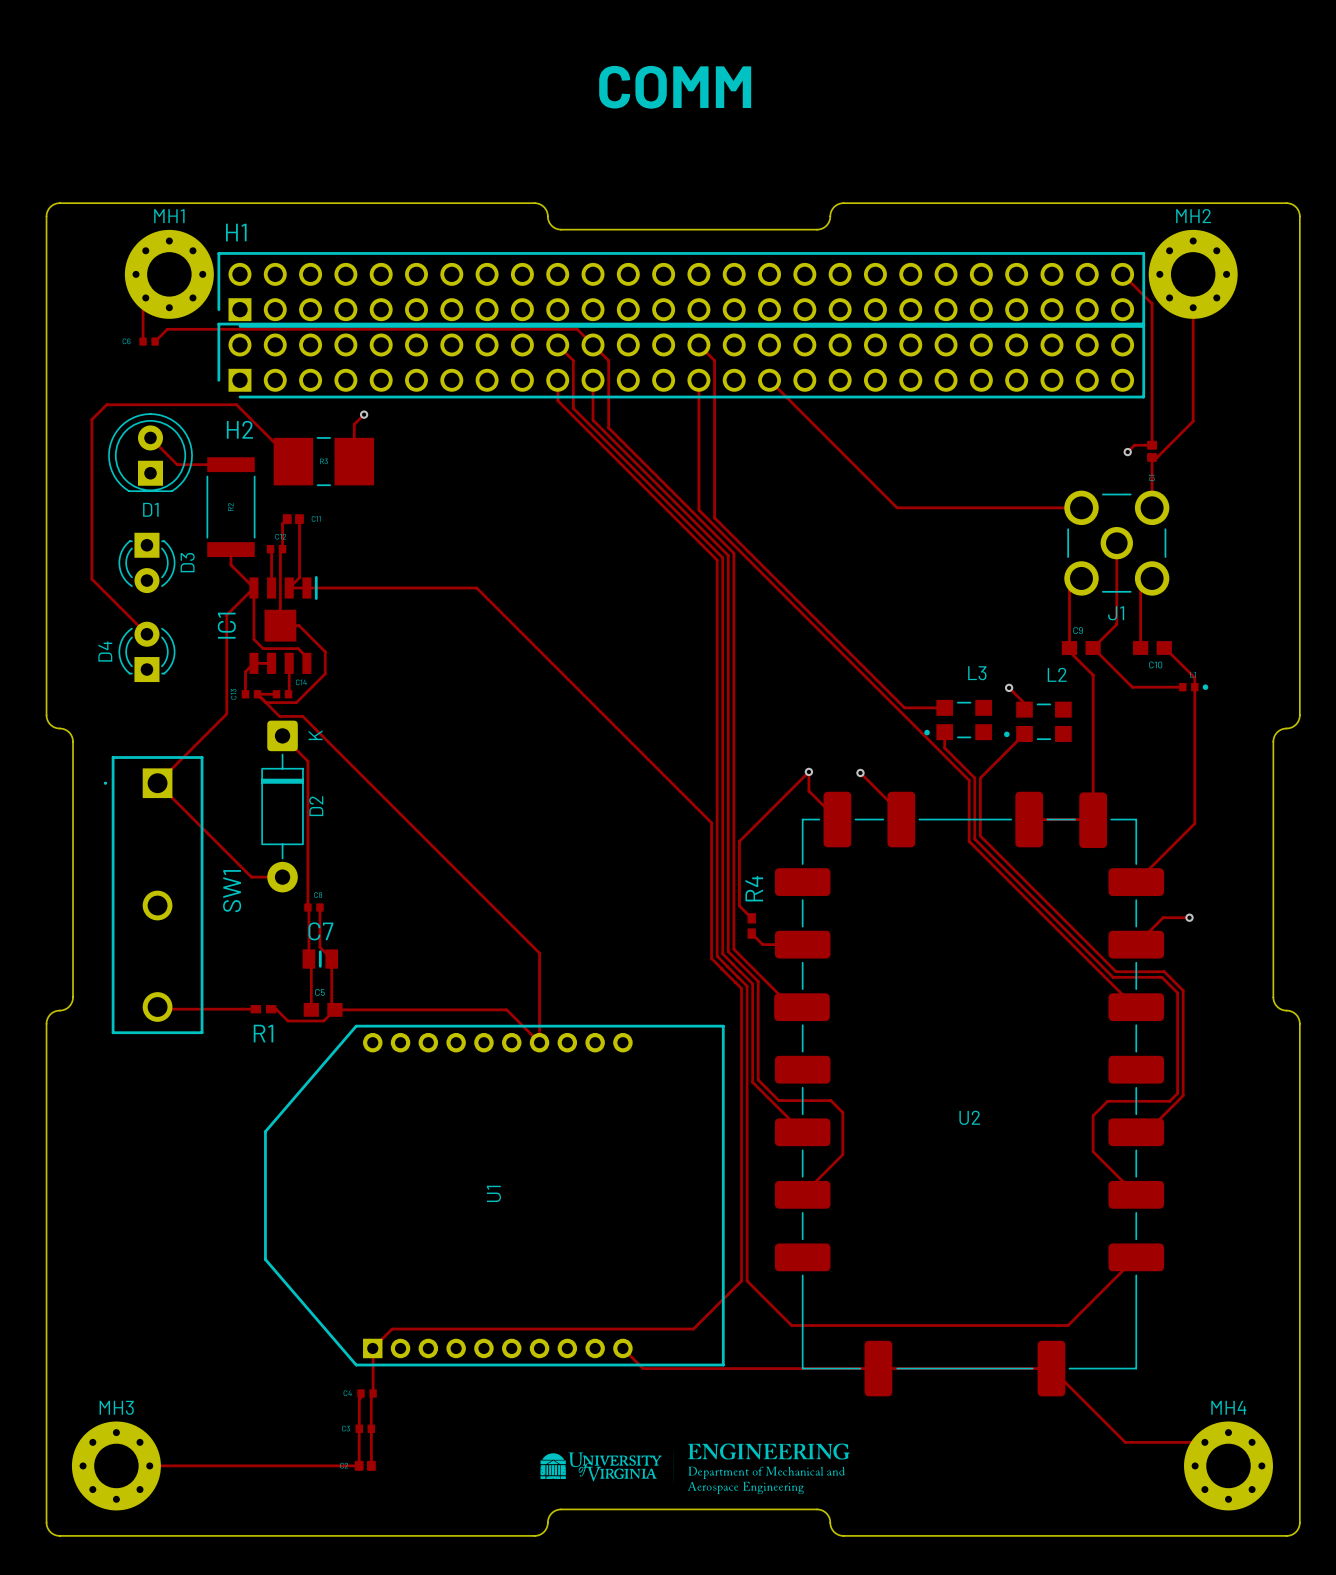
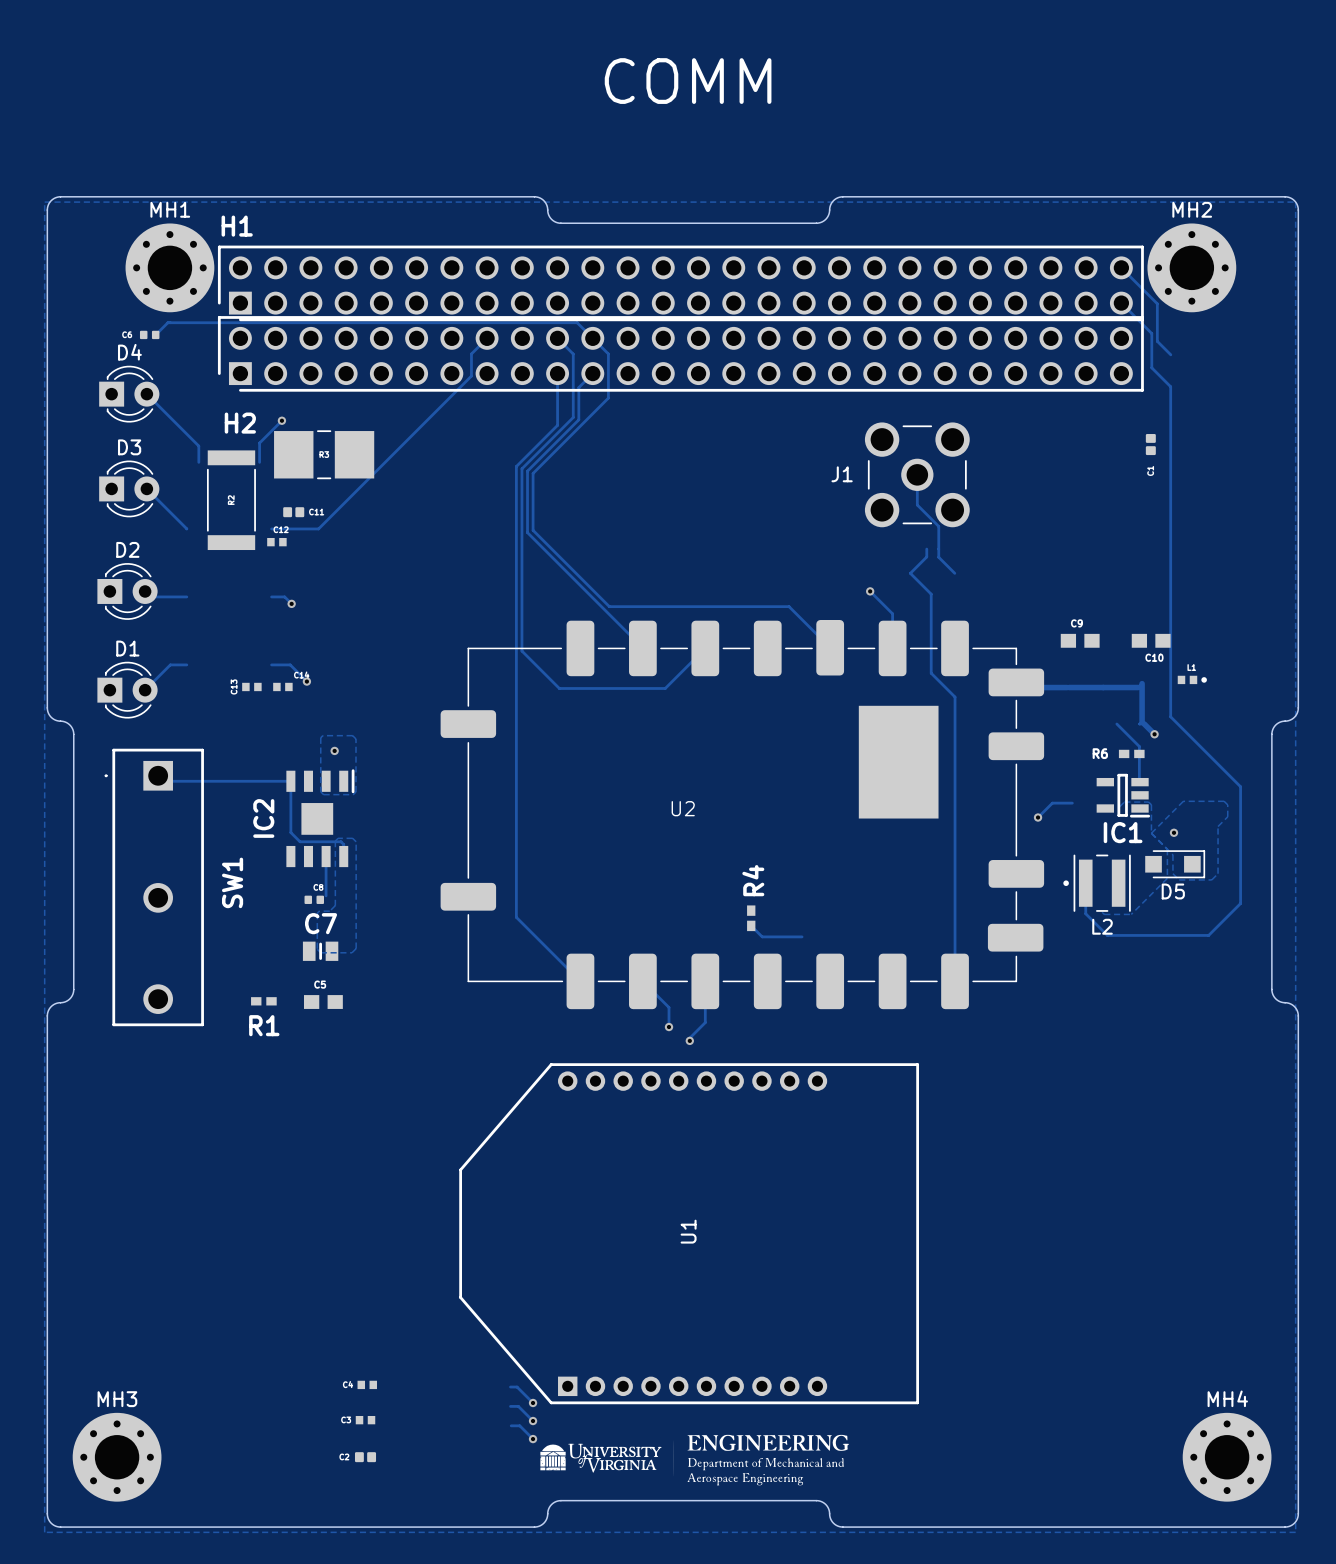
zone outline: none -> (44, 202) (1295, 202) (1295, 1532) (44, 1532) (44, 202)
track: (145, 297) (143, 300) (143, 341) -> none
track: (1152, 303) (1152, 445) (1134, 445) (1127, 452) -> (1150, 297) (1157, 303) (1157, 341) (1170, 354)
track: (1193, 307) (1193, 421) (1157, 457) (1152, 457) (1152, 507) -> none
track: none -> (1121, 303) (1151, 333) (1151, 367) (1170, 386) (1170, 716) (1240, 786) (1240, 903) (1208, 935) (1107, 935) (1085, 913) (1085, 883)
track: none -> (487, 338) (471, 353) (471, 376) (318, 528) (271, 528)
track: (698, 344) (714, 360) (714, 517) (904, 707) (944, 707) -> none
track: (573, 360) (573, 408) (722, 557) (722, 953) (733, 964) -> (573, 354) (573, 417) (521, 468) (521, 651) (559, 688) (665, 688) (705, 648)
track: (557, 380) (557, 400) (717, 560) (717, 956) (727, 966) -> (557, 373) (557, 425) (516, 466) (516, 917) (580, 981)
track: (593, 380) (593, 420) (728, 555) (728, 951) (758, 981) (758, 1079) (778, 1100) (830, 1100) (842, 1112) (842, 1154) (802, 1194) -> (592, 373) (578, 387) (578, 419) (527, 471) (527, 532) (642, 648)
track: (698, 380) (698, 510) (969, 780) (969, 841) (1136, 1007) -> none
track: (769, 380) (897, 507) (1081, 507) -> none
track: none -> (146, 394) (198, 446) (198, 462)
track: (608, 404) (608, 427) (733, 553) (733, 949) (791, 1007) (801, 1007) -> (608, 398) (533, 473) (533, 530) (609, 606) (789, 606) (830, 647)
D1 footprint: [108, 413, 193, 493] -> [97, 661, 158, 719]
track: (364, 414) (354, 424) (354, 461) -> none
via: (364, 414) -> none
track: none -> (281, 420) (259, 443) (259, 462)
via: none -> (281, 420)
track: (150, 437) (177, 464) (230, 464) -> none
via: (1127, 452) -> none
track: (293, 461) (236, 404) (106, 404) (91, 419) (91, 579) (146, 634) -> none
track: none -> (917, 474) (917, 505) (938, 526) (938, 557) (954, 573)
track: none -> (146, 488) (186, 528)
D1 name position: D1 (150, 509) -> D1 (127, 648)
track: (287, 519) (282, 523) (282, 549) (280, 551) (280, 625) (299, 625) (325, 651) (325, 673) (296, 702) (265, 702) -> none
track: (299, 519) (299, 577) (289, 587) (476, 587) (711, 822) (711, 958) (741, 988) (741, 1280) (693, 1329) (392, 1329) (372, 1348) (371, 1465) -> none
track: (1116, 543) (1116, 624) (1093, 648) (1132, 687) (1182, 687) -> none
J1 position: (1116, 543) -> (917, 474)
track: (230, 549) (230, 565) (253, 587) -> none
track: (270, 549) (271, 587) -> none
track: none -> (926, 549) (926, 556) (910, 573) (931, 594) (931, 673) (955, 697) (955, 981)
D3 rotation: 0° (146, 562) -> 90° counterclockwise (129, 488)
D3 position: (146, 562) -> (129, 488)
IC1 footprint: [249, 575, 318, 674] -> [1096, 773, 1151, 818]
track: (1081, 578) (1069, 590) (1069, 651) (1093, 675) -> none
track: (1152, 578) (1140, 589) (1140, 648) -> none
track: (253, 587) (253, 639) (263, 648) (298, 648) (306, 657) (306, 663) -> none
track: (253, 587) (226, 615) (226, 714) (157, 783) (251, 877) (282, 877) -> none
track: none -> (145, 591) (150, 596) (186, 596)
track: none -> (870, 591) (892, 613) (892, 648)
via: none -> (870, 591)
track: none -> (271, 596) (284, 596) (291, 603)
via: none -> (291, 603)
J1 name position: J1 (1116, 613) -> J1 (842, 474)
IC1 name position: IC1 (226, 625) -> IC1 (1123, 832)
track: (1164, 648) (1194, 677) (1194, 823) (1136, 882) -> none
D4 rotation: 0° (146, 651) -> 90° clockwise (129, 394)
D4 position: (146, 651) -> (129, 394)
track: (271, 663) (253, 663) (245, 671) (245, 694) -> none
track: (289, 663) (288, 694) -> none
track: none -> (186, 664) (170, 664) (145, 690)
track: none -> (271, 664) (290, 664) (306, 681)
L2 name position: L2 (1057, 674) -> L2 (1102, 926)
track: (1093, 675) (1093, 820) (1029, 819) -> none
track: (1009, 687) (1024, 703) (1024, 709) -> none
via: (1009, 687) -> none
via: none -> (306, 681)
track: none -> (1016, 682) (1021, 687) (1138, 687) (1142, 683) (1142, 721) (1139, 724) (1144, 724) (1154, 734)
track: (276, 694) (257, 694) (279, 716) (302, 716) (539, 953) (539, 1042) (506, 1009) (334, 1009) -> none
L2 footprint: [1004, 701, 1072, 742] -> [1063, 854, 1131, 912]
D2 footprint: [261, 720, 304, 893] -> [97, 563, 158, 620]
L3: (958, 720) -> none
track: none -> (1116, 724) (1139, 746) (1140, 782)
track: (944, 732) (944, 748) (974, 778) (974, 839) (1113, 977) (1161, 977) (1177, 992) (1177, 1093) (1169, 1101) (1107, 1101) (1093, 1115) (1093, 1151) (1136, 1194) -> none
track: (1024, 733) (980, 778) (980, 836) (1116, 971) (1164, 971) (1183, 990) (1183, 1095) (1146, 1132) (1136, 1132) -> none
track: (282, 735) (307, 761) (307, 907) (308, 959) (311, 961) (311, 1009) -> none
via: none -> (1154, 734)
zone outline: none -> (322, 735) (352, 735) (356, 738) (356, 792) (353, 794) (323, 794) (320, 791) (320, 737) (322, 735)
via: none -> (334, 750)
R6: none -> (1131, 753)
via: (808, 771) -> none
track: (860, 772) (901, 813) (901, 819) -> none
via: (860, 772) -> none
track: none -> (155, 780) (290, 781) (290, 832) (300, 841) (341, 841) (343, 844) (343, 856)
U2 footprint: [774, 791, 1165, 1397] -> [440, 620, 1045, 1010]
D2 name position: D2 (316, 806) -> D2 (127, 549)
track: none -> (1072, 803) (1052, 803) (1038, 817)
zone outline: none -> (1119, 806) (1124, 802) (1148, 802) (1151, 804) (1151, 833)
track: (837, 819) (808, 791) (808, 771) (739, 841) (739, 906) (751, 918) -> none
IC2: none -> (320, 818)
via: none -> (1038, 817)
zone outline: none -> (1151, 833) (1172, 854) (1172, 873) (1179, 879) (1211, 879) (1218, 873) (1218, 826) (1227, 816) (1227, 804) (1224, 801) (1183, 801) (1151, 833)
zone outline: none -> (338, 838) (352, 838) (356, 841) (356, 948) (351, 952) (320, 952) (317, 949) (317, 913) (319, 911) (329, 911) (335, 905) (335, 841) (338, 838)
zone outline: none -> (1167, 849) (1167, 878) (1131, 914) (1104, 914) (1102, 912)
track: none -> (326, 856) (326, 895)
D5: none -> (1175, 864)
track: (319, 907) (319, 947) (331, 959) (331, 1006) (334, 1009) -> none
track: (1189, 917) (1163, 917) (1136, 944) -> none
via position: (1189, 917) -> (1173, 832)
track: (733, 964) (740, 971) -> none
track: (727, 966) (737, 976) -> none
track: (740, 971) (752, 983) (752, 1082) (802, 1132) -> none
track: (737, 976) (747, 986) (747, 1280) (791, 1325) (1068, 1325) (1136, 1257) -> none
track: none -> (642, 981) (669, 1007) (669, 1027)
track: none -> (705, 981) (705, 1022) (689, 1038) (689, 1040)
track: (157, 1007) (159, 1009) (255, 1009) -> none
track: (271, 1009) (276, 1009) (288, 1021) (323, 1021) (334, 1009) -> none
via: none -> (669, 1027)
via: none -> (689, 1040)
U2 name position: U2 (969, 1117) -> U2 (683, 808)
U1 position: (494, 1195) -> (689, 1233)
track: (622, 1348) (643, 1368) (1051, 1368) (1125, 1442) (1204, 1442) (1204, 1434) -> none
track: (360, 1393) (359, 1399) (359, 1465) (149, 1465) -> none
track: none -> (510, 1387) (517, 1387) (533, 1402)
via: none -> (533, 1402)
track: none -> (510, 1406) (518, 1406) (533, 1421)
via: none -> (533, 1421)
track: none -> (511, 1425) (519, 1425) (533, 1439)
via: none -> (533, 1439)

